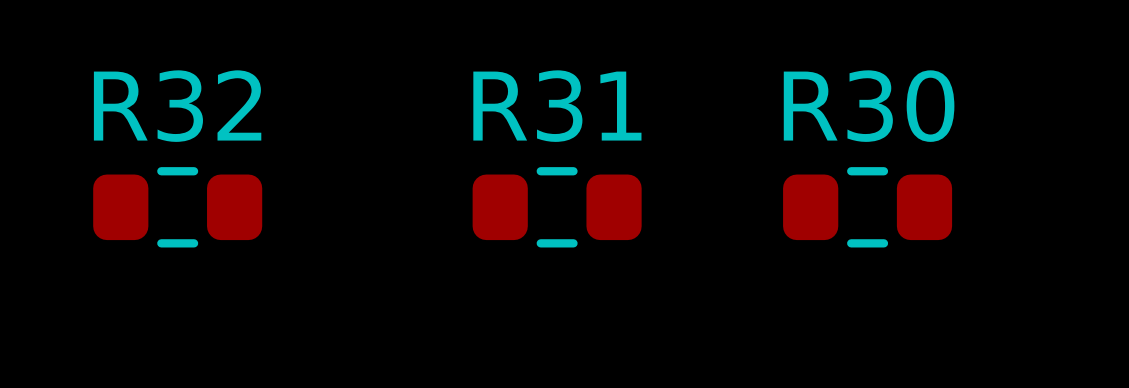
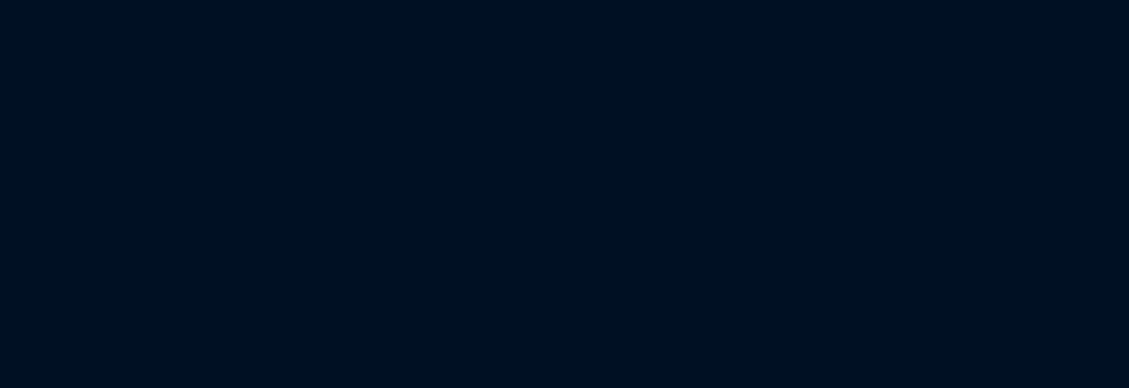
R32: (177, 207) -> none
R31: (557, 207) -> none
R30: (867, 207) -> none

